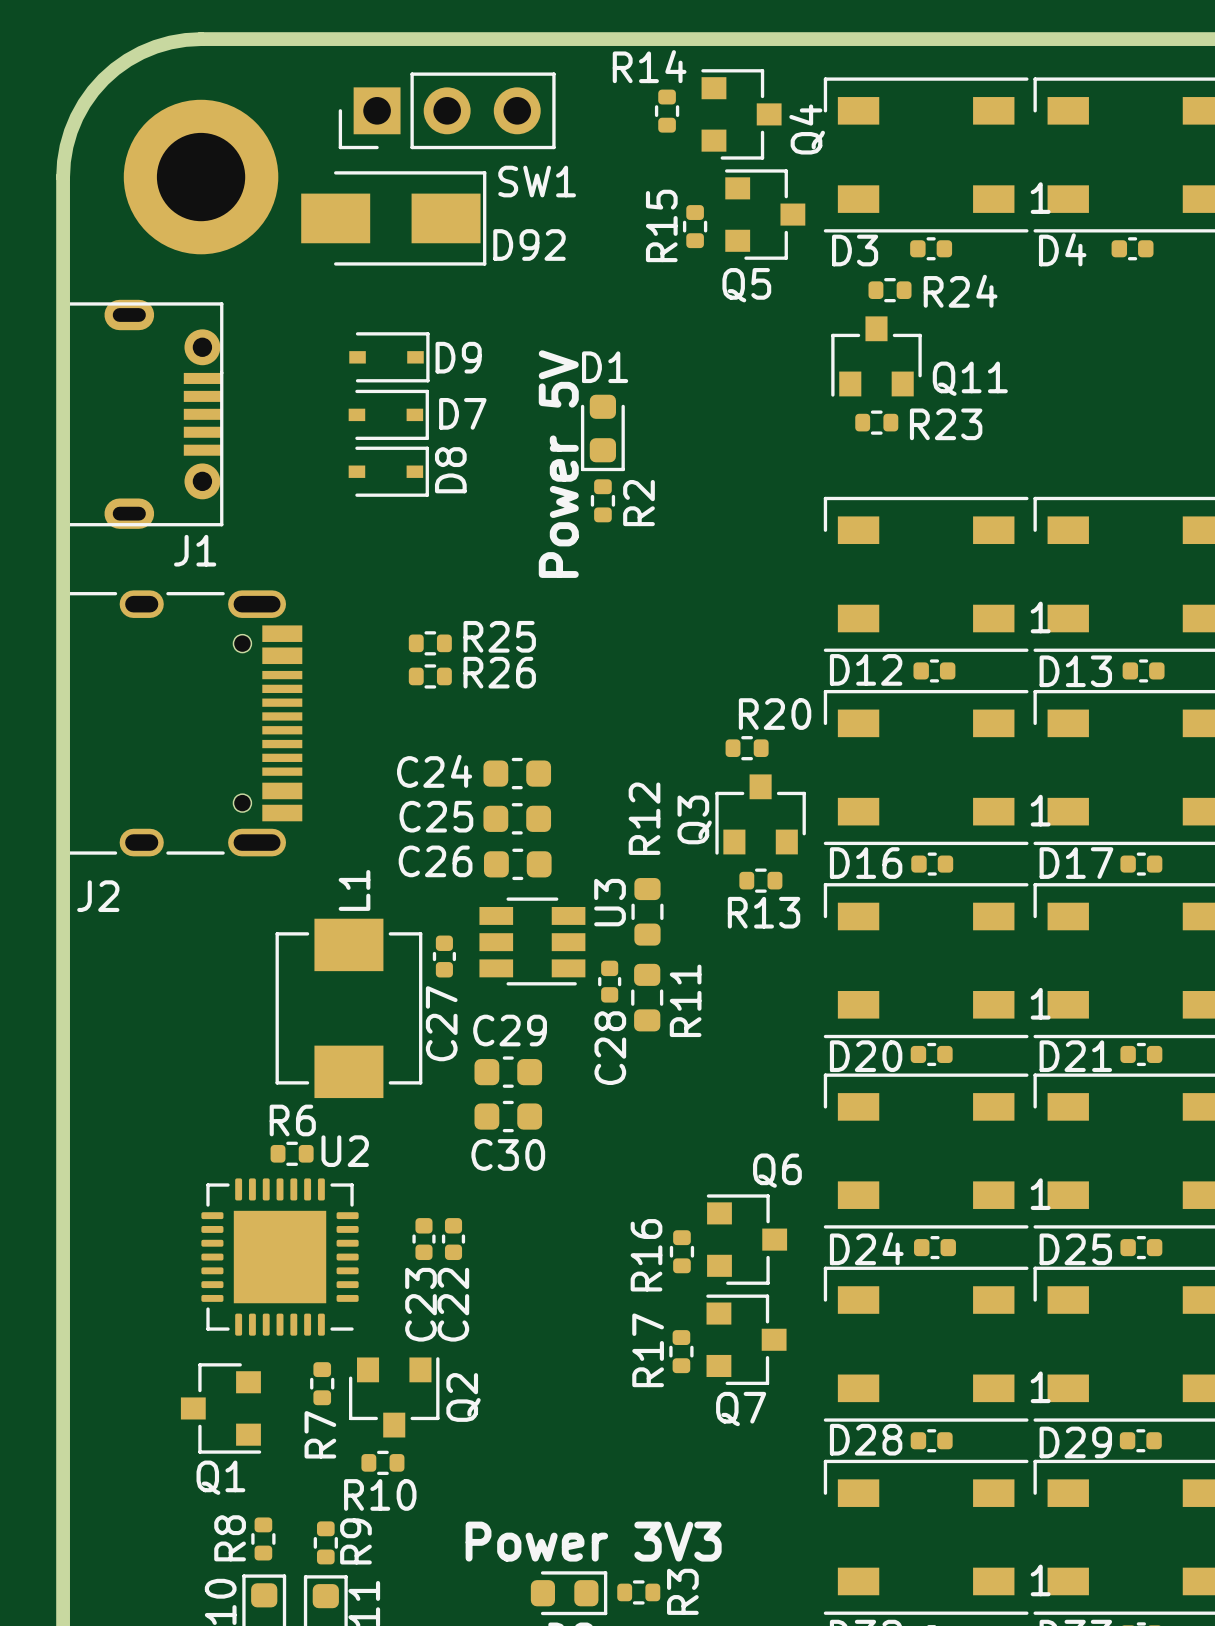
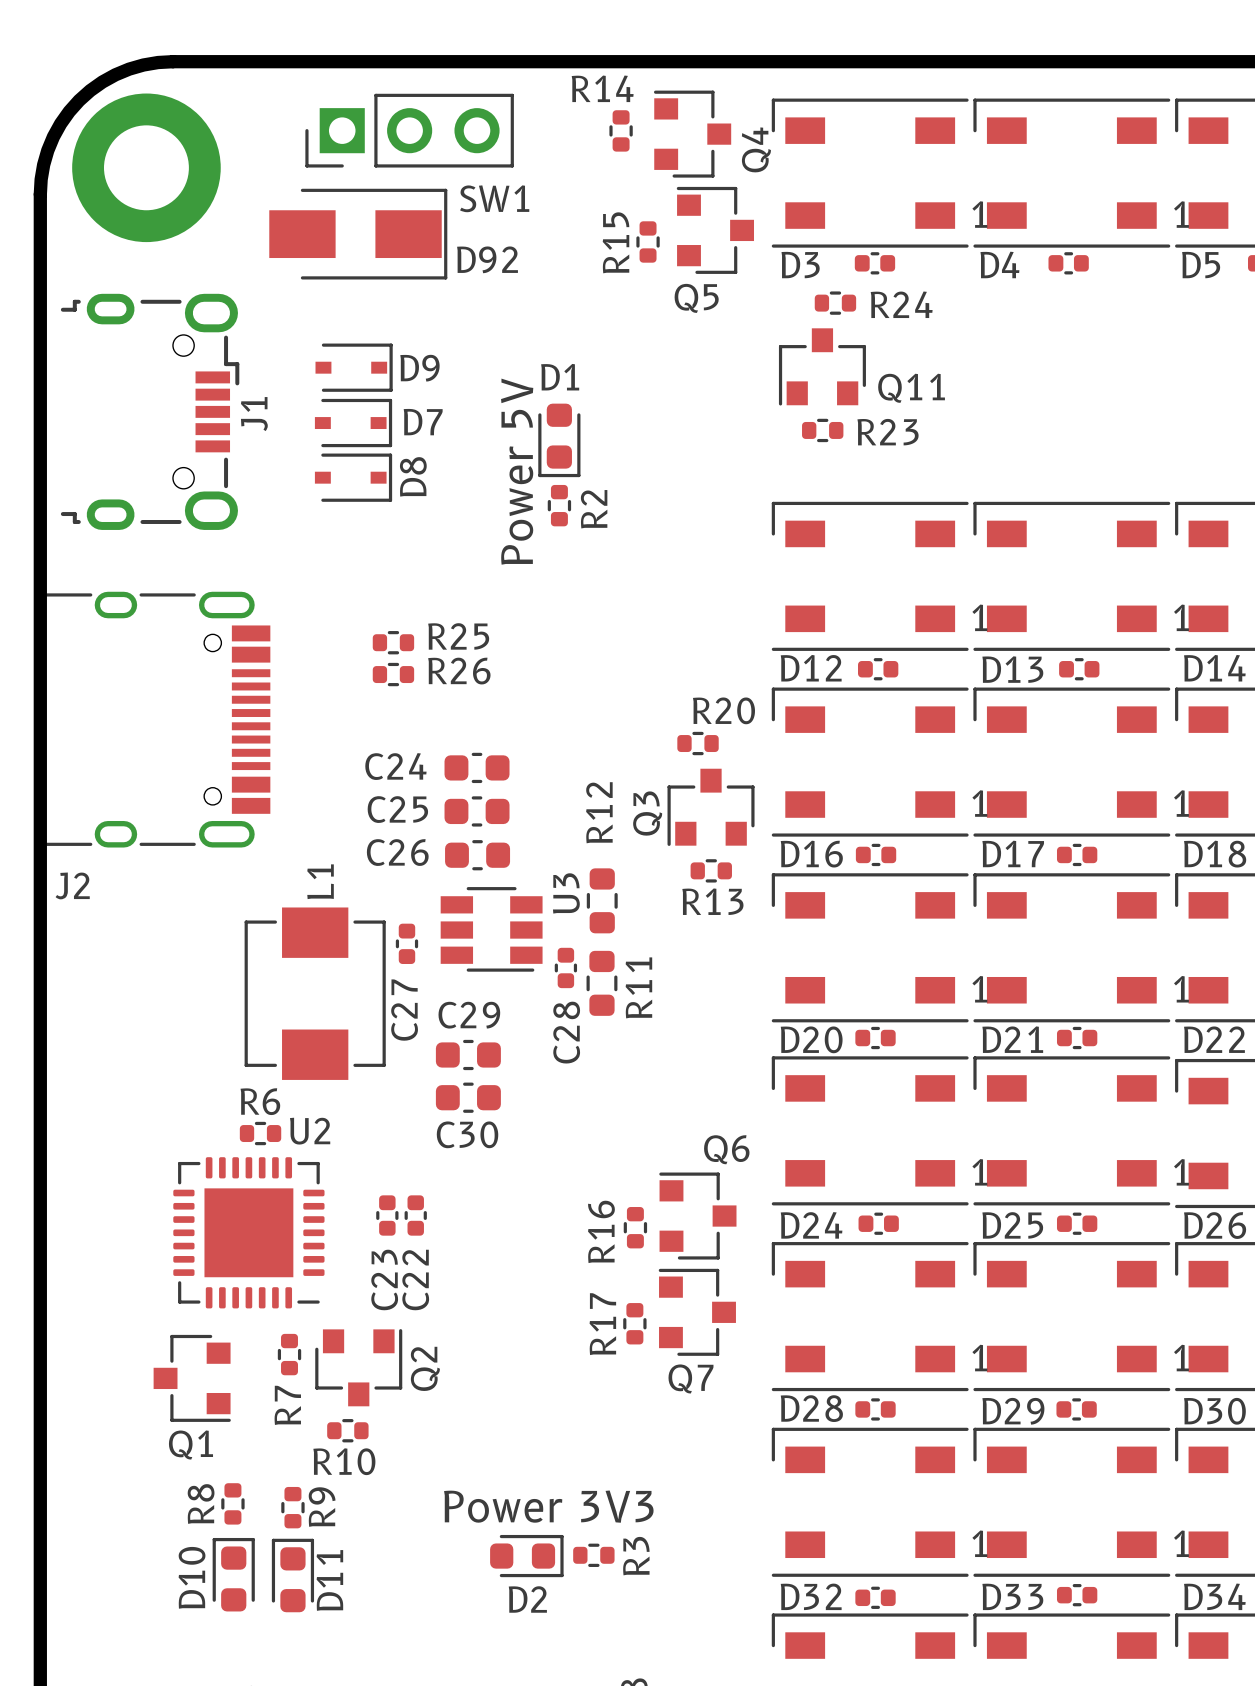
part position: (201, 177) -> (146, 167)
J1 footprint: [57, 299, 224, 529] -> [60, 293, 240, 530]
J1 name position: J1 (195, 550) -> J1 (254, 414)

